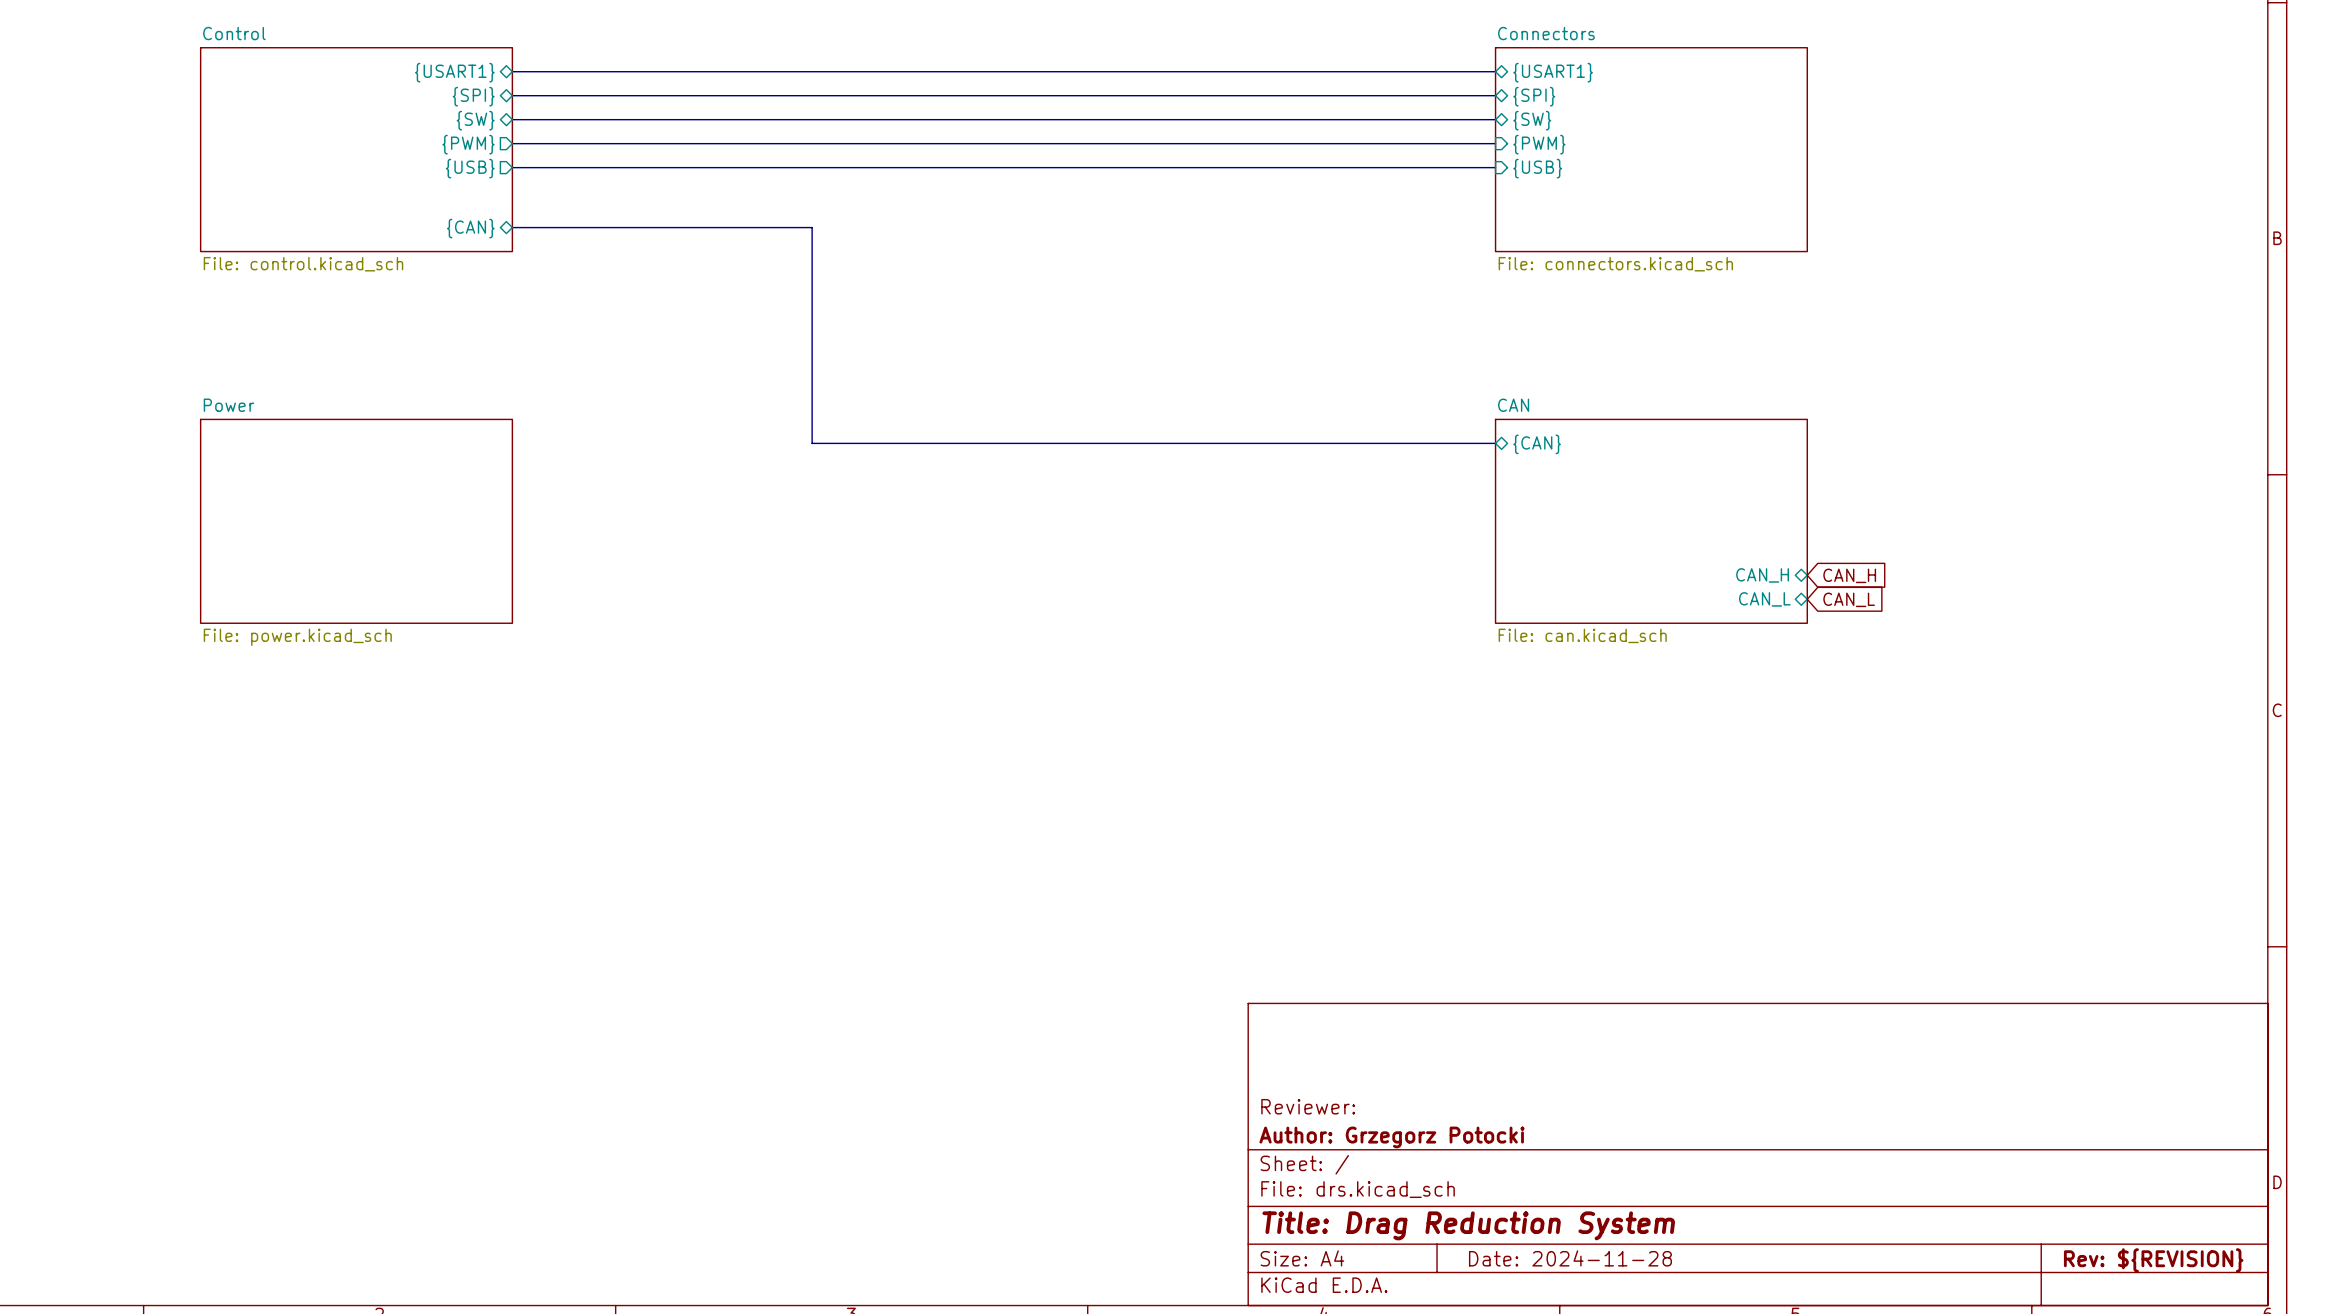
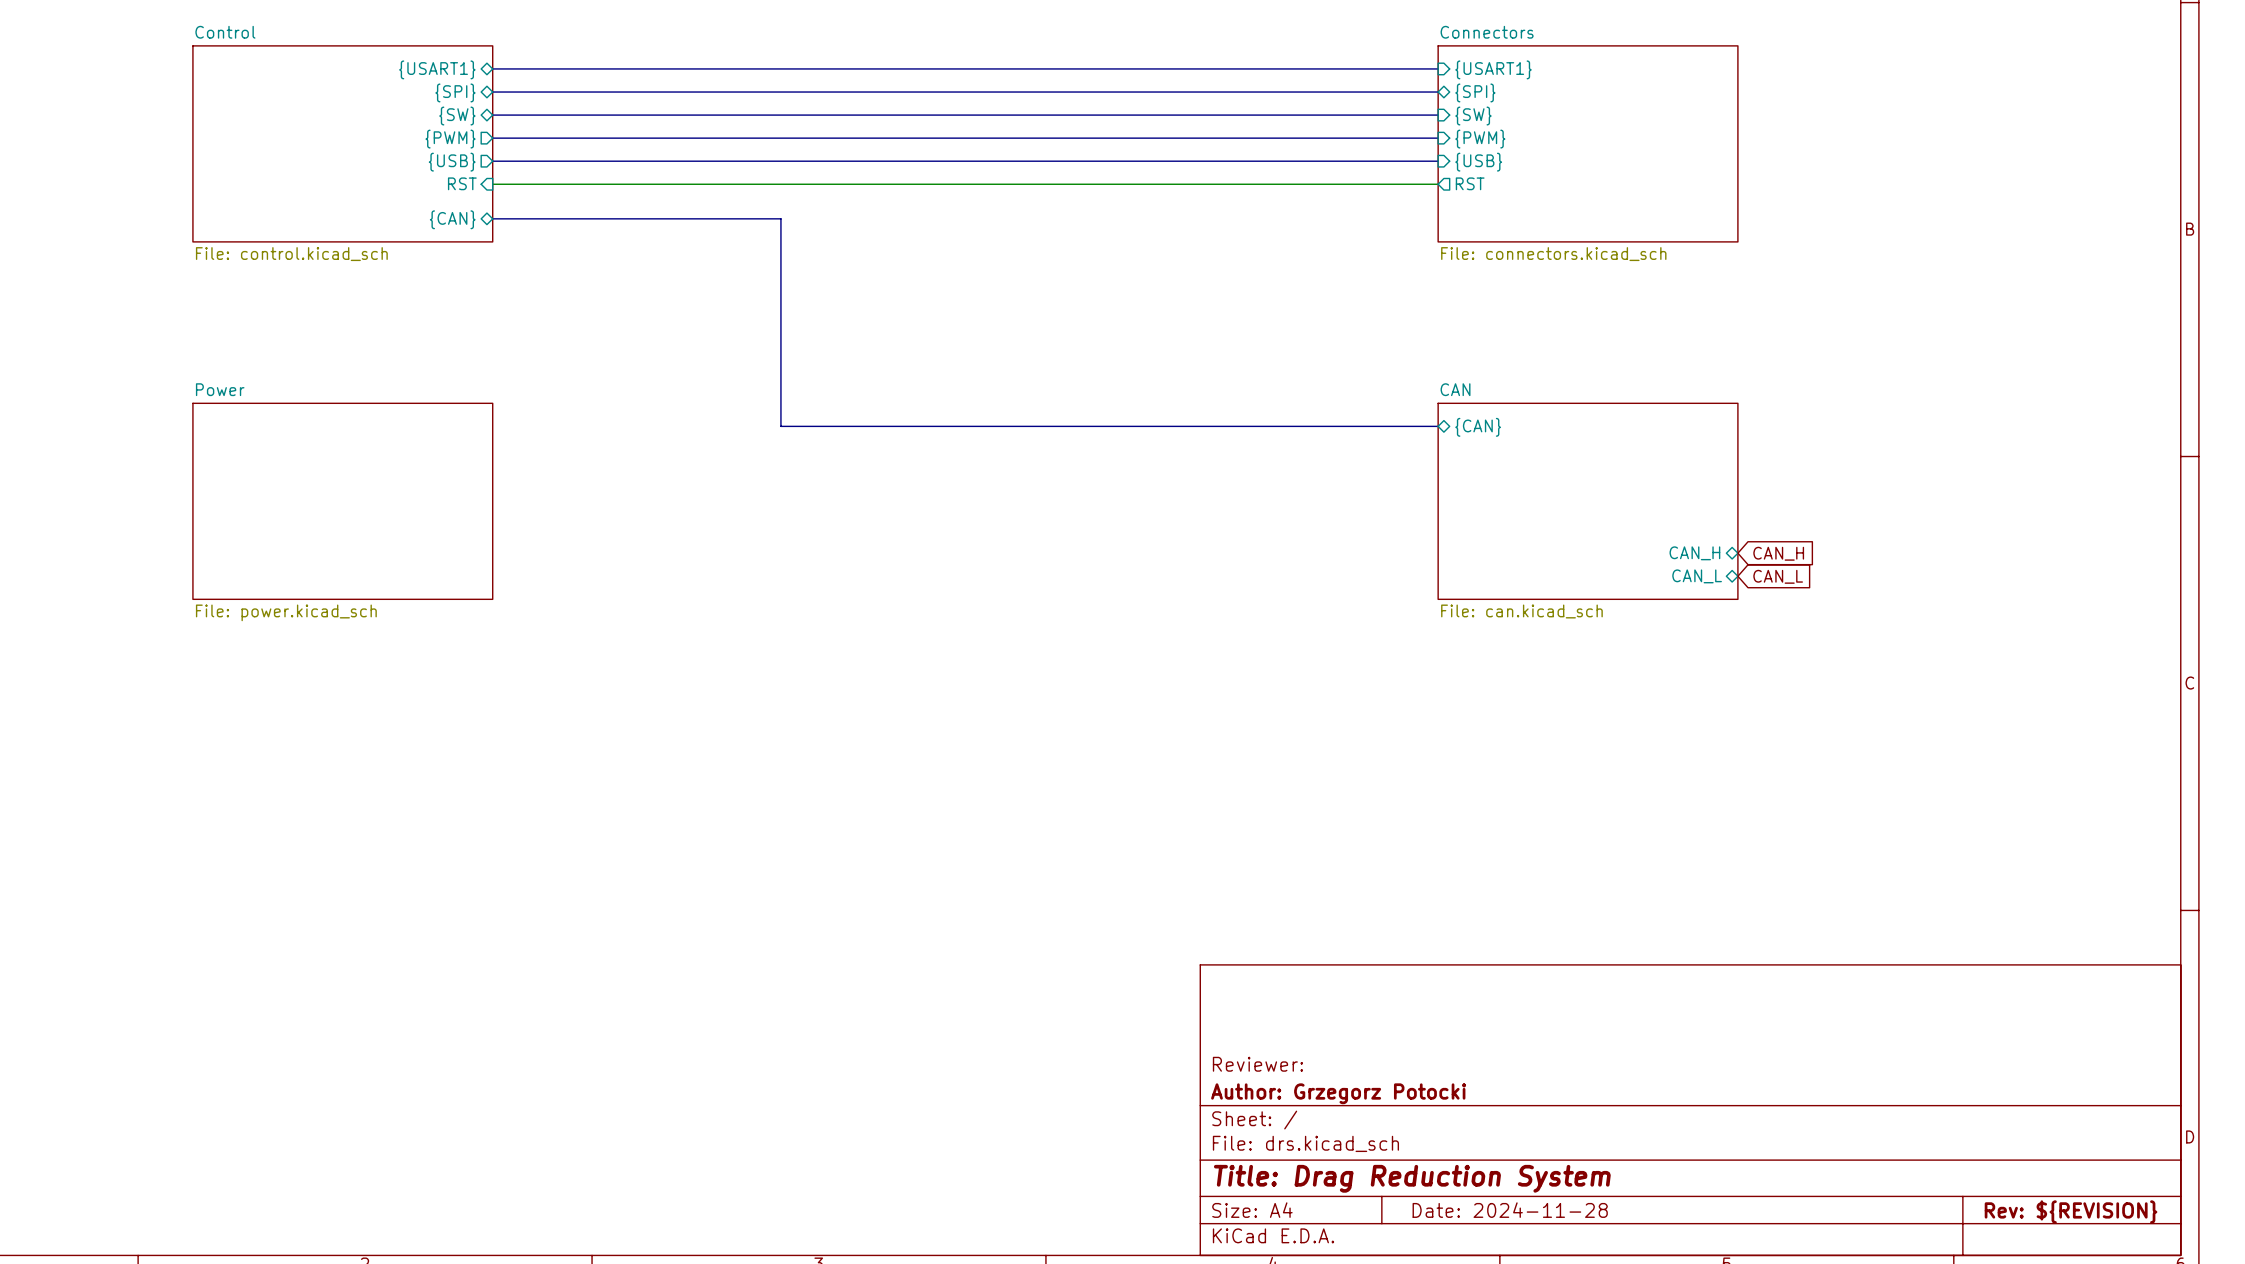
sheet pin shape: bidirectional (1553, 72) -> input (1493, 69)
sheet pin shape: bidirectional (1532, 120) -> input (1473, 116)
sheet pin: none -> RST (462, 183)
wire: none -> (492, 184) (1438, 184)
sheet pin: none -> RST (1470, 183)

